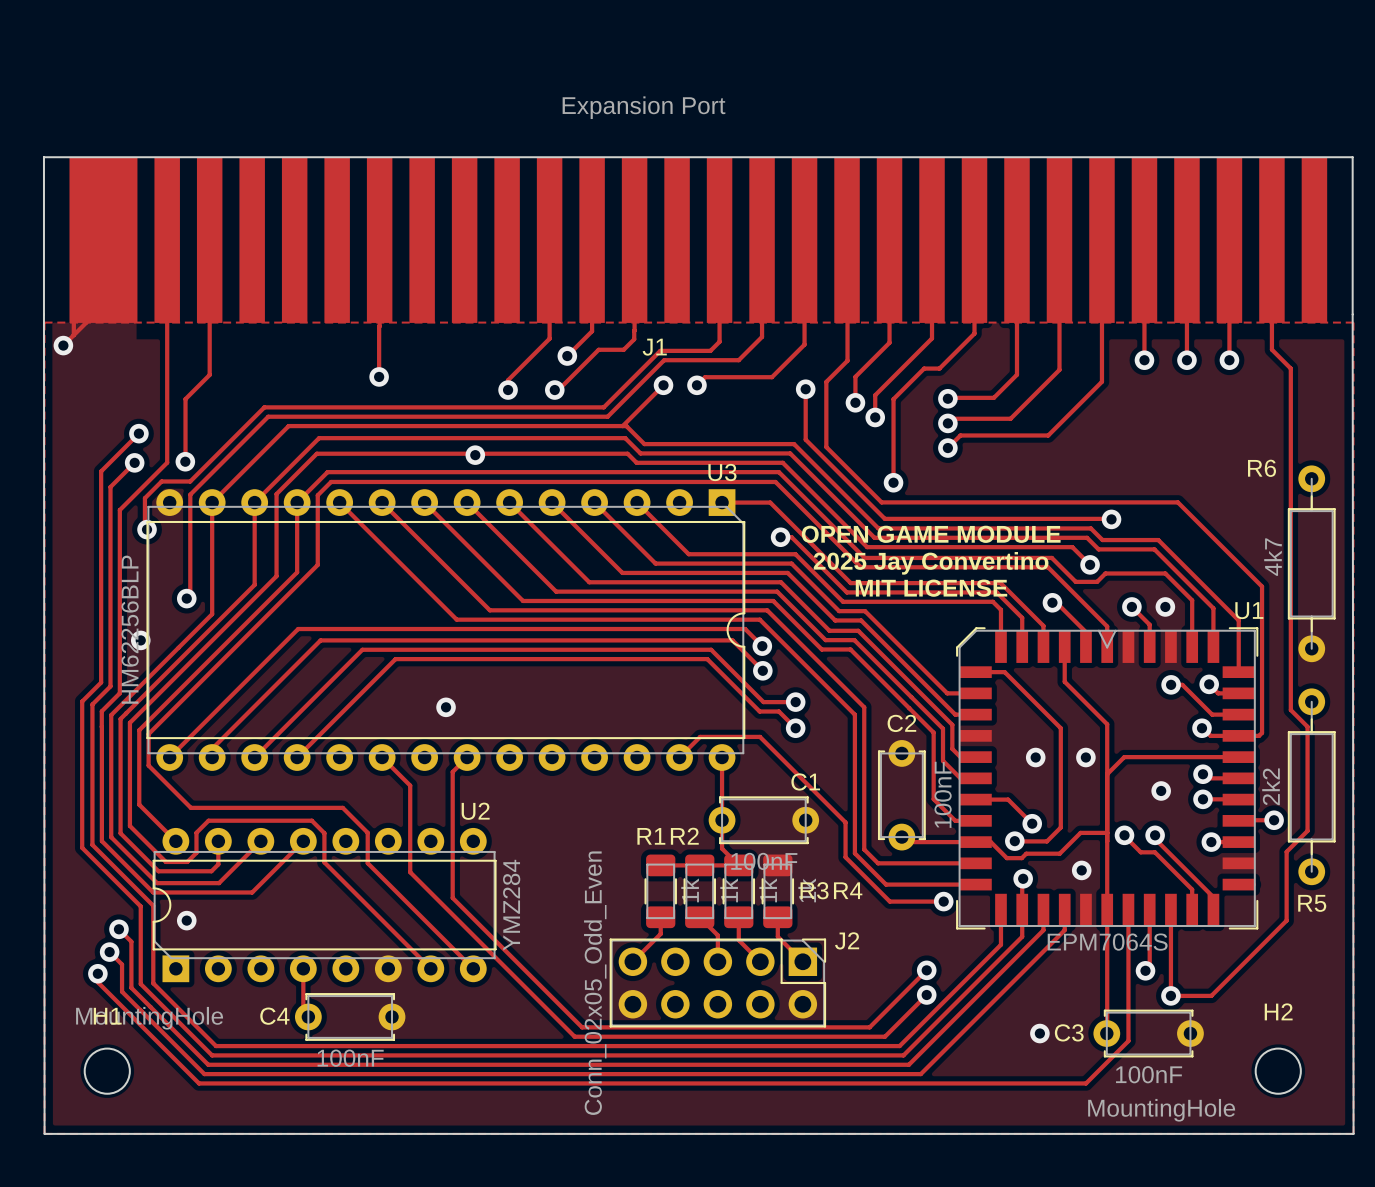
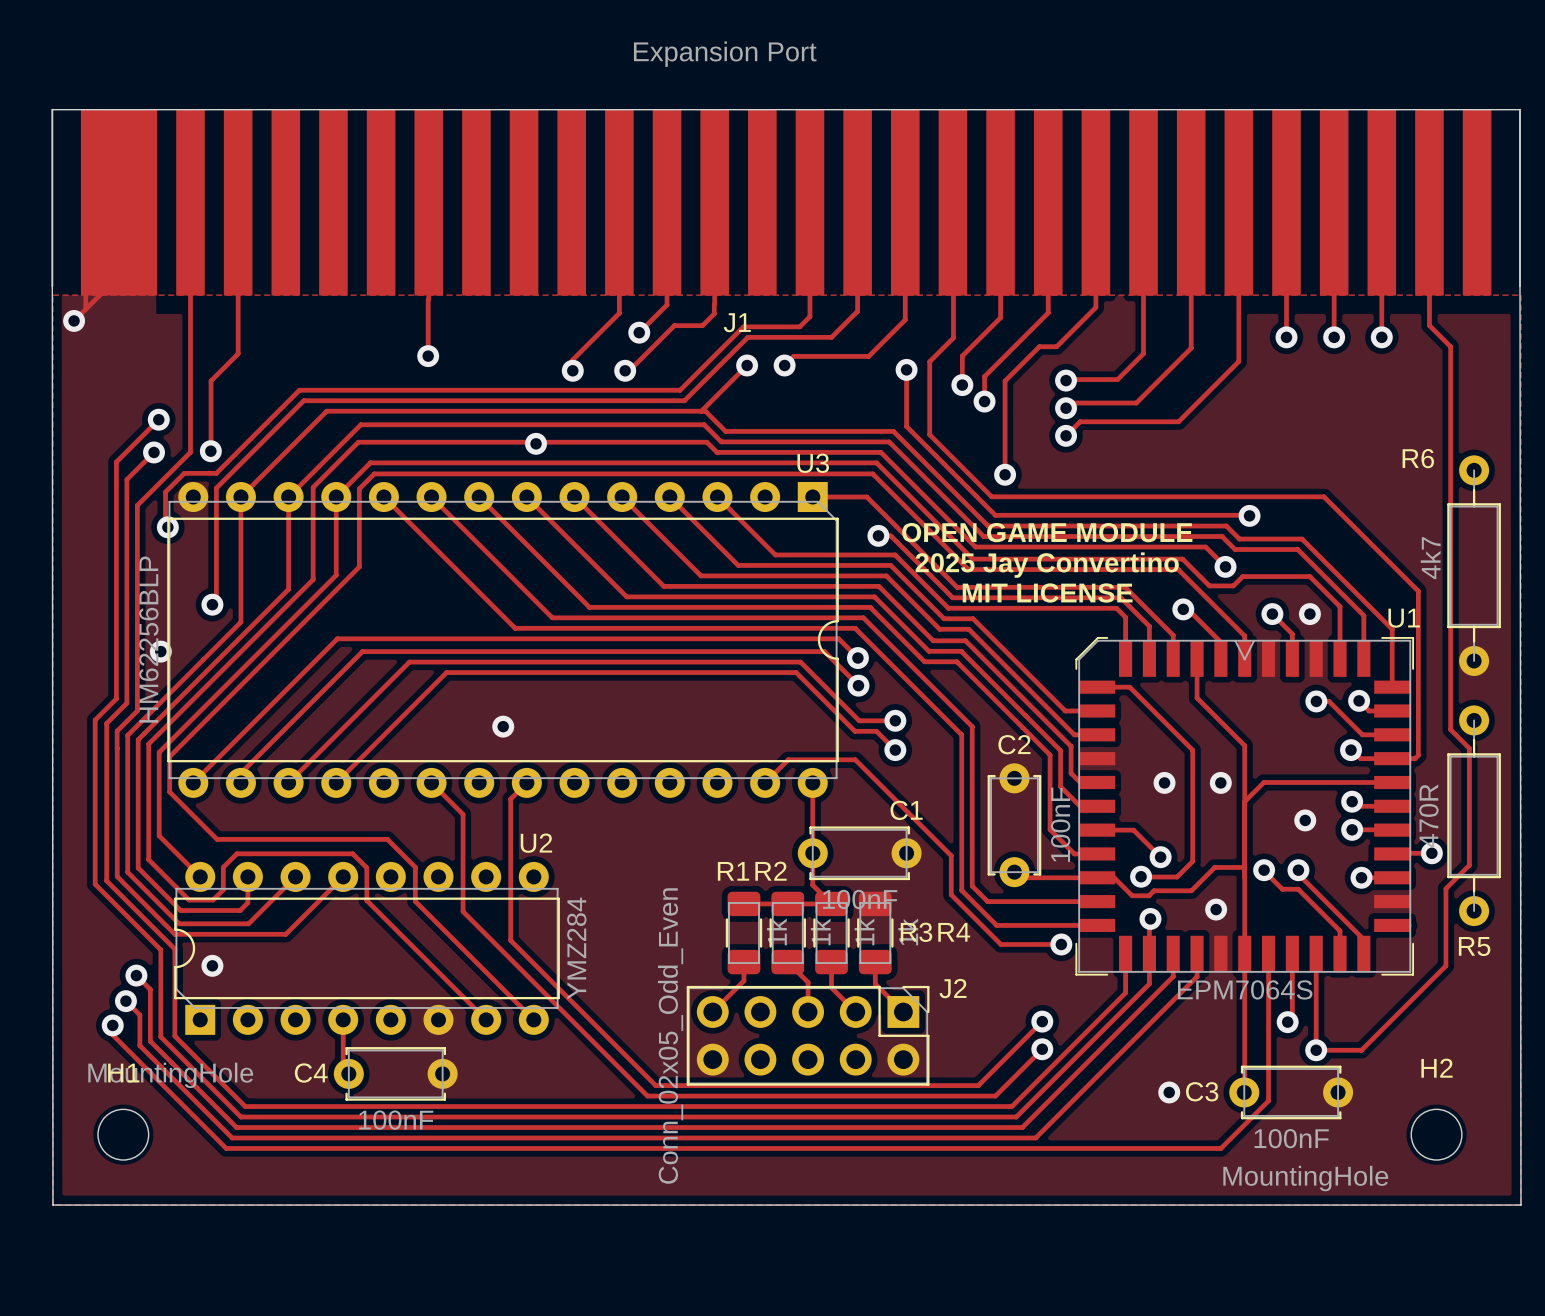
R5 value: 2k2 (1271, 786) -> 470R (1428, 816)

